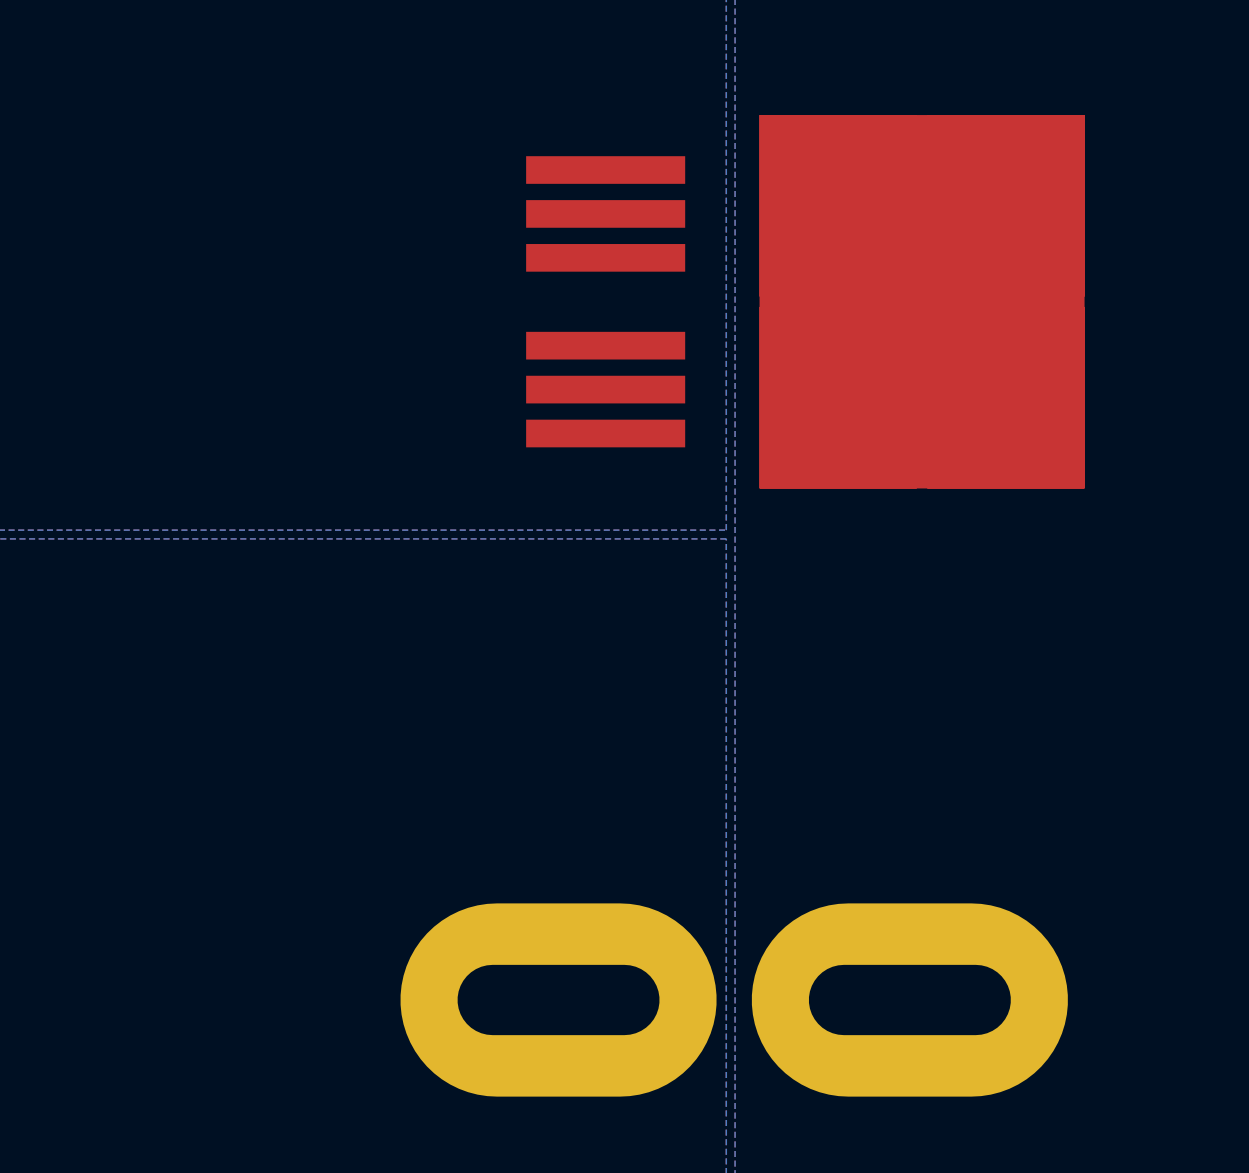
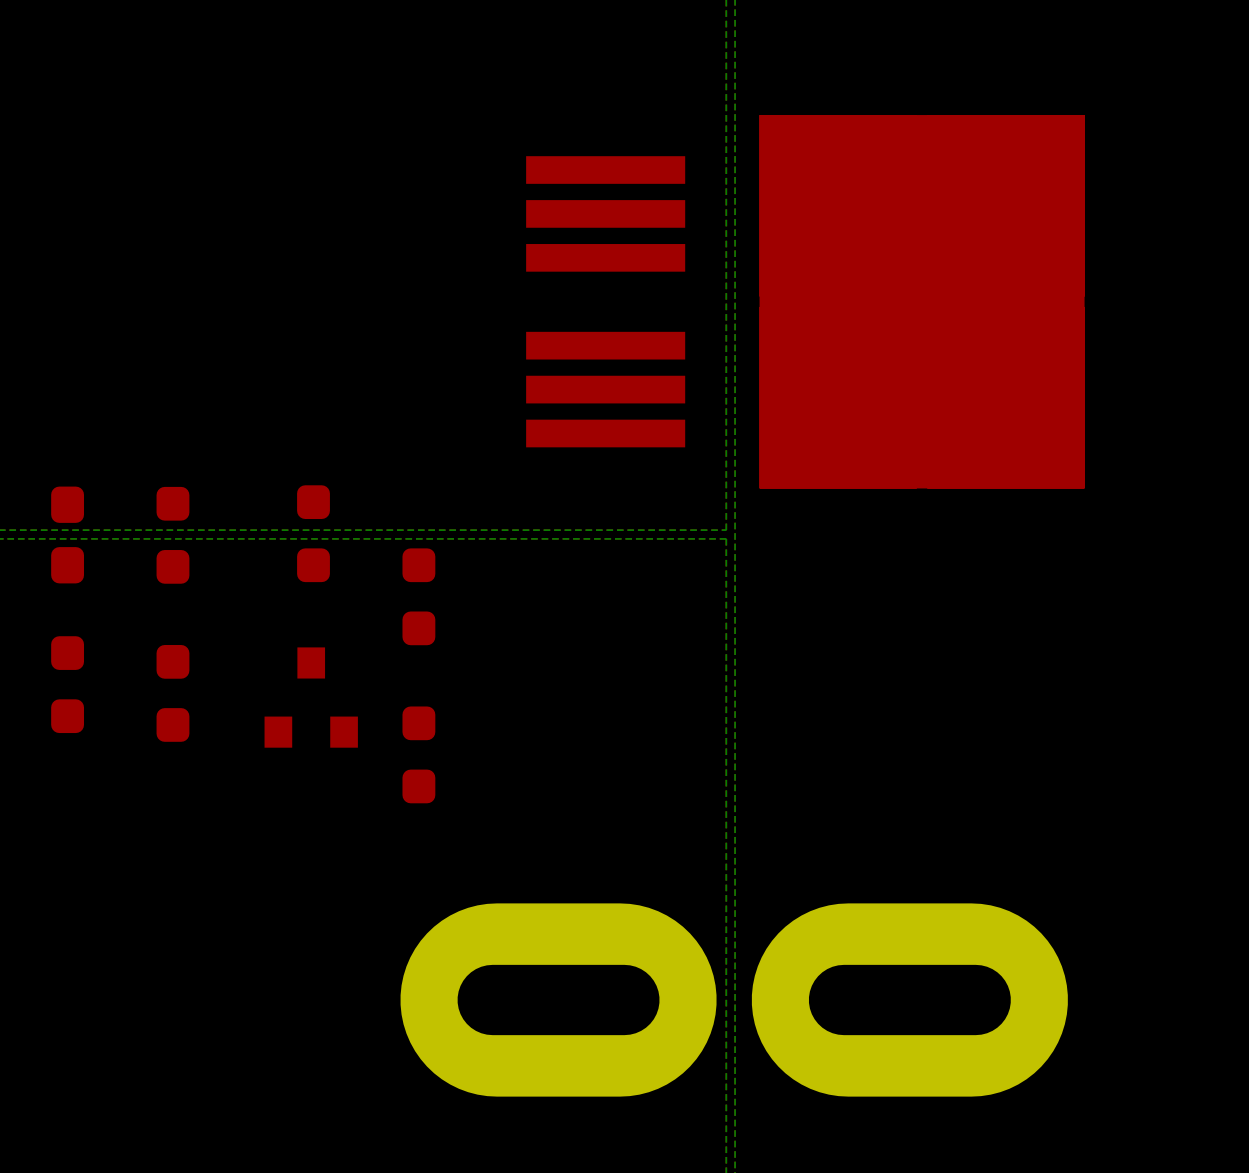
part: none -> (313, 533)
part: none -> (67, 534)
part: none -> (172, 535)
part: none -> (418, 596)
part: none -> (67, 684)
part: none -> (172, 693)
part: none -> (311, 697)
part: none -> (418, 754)

